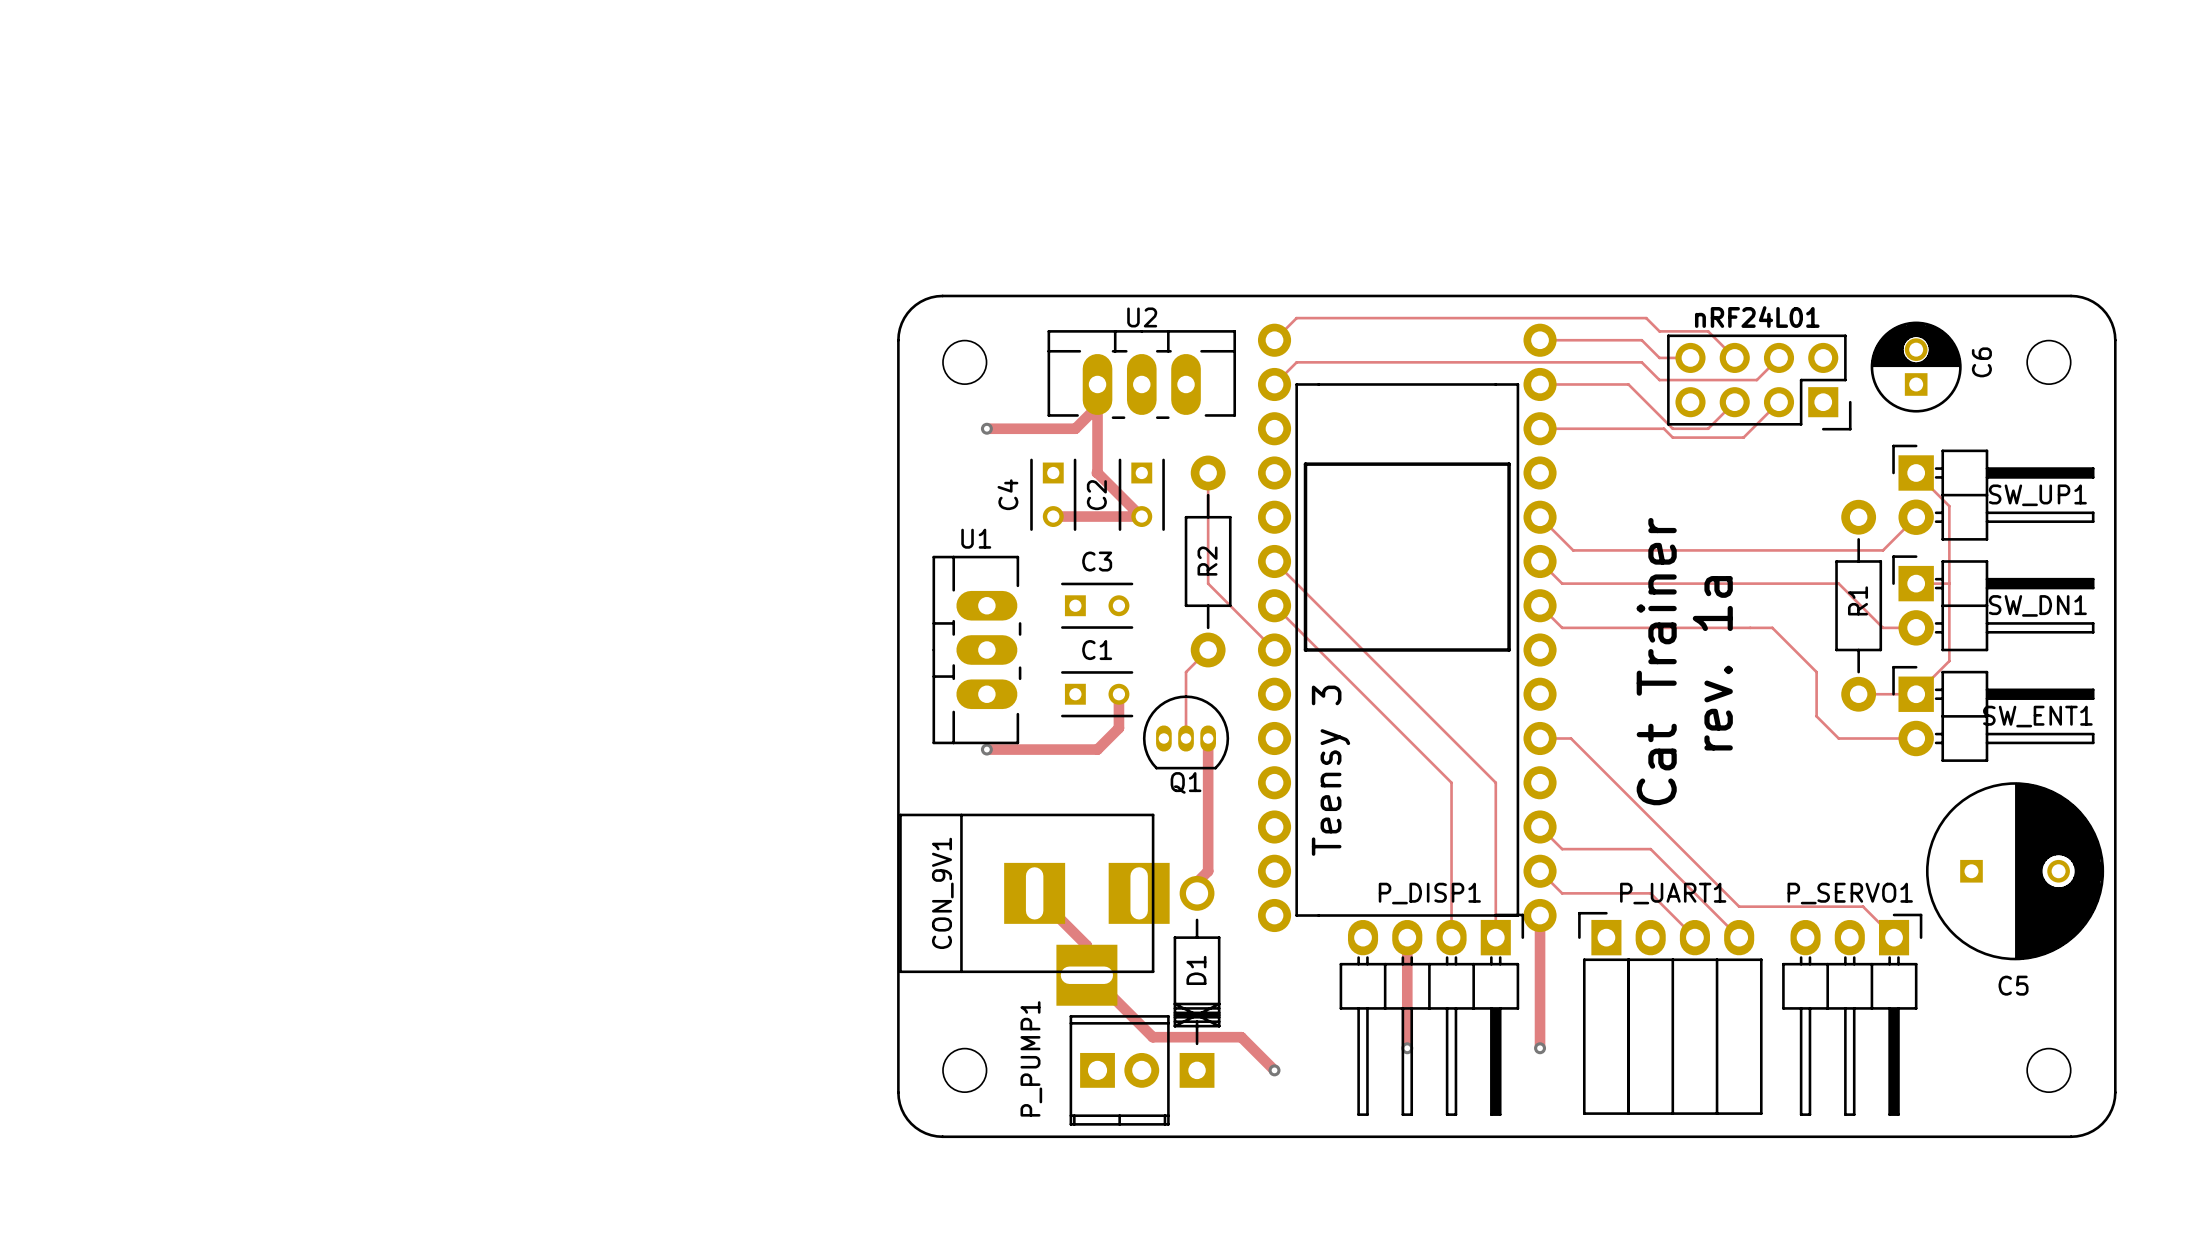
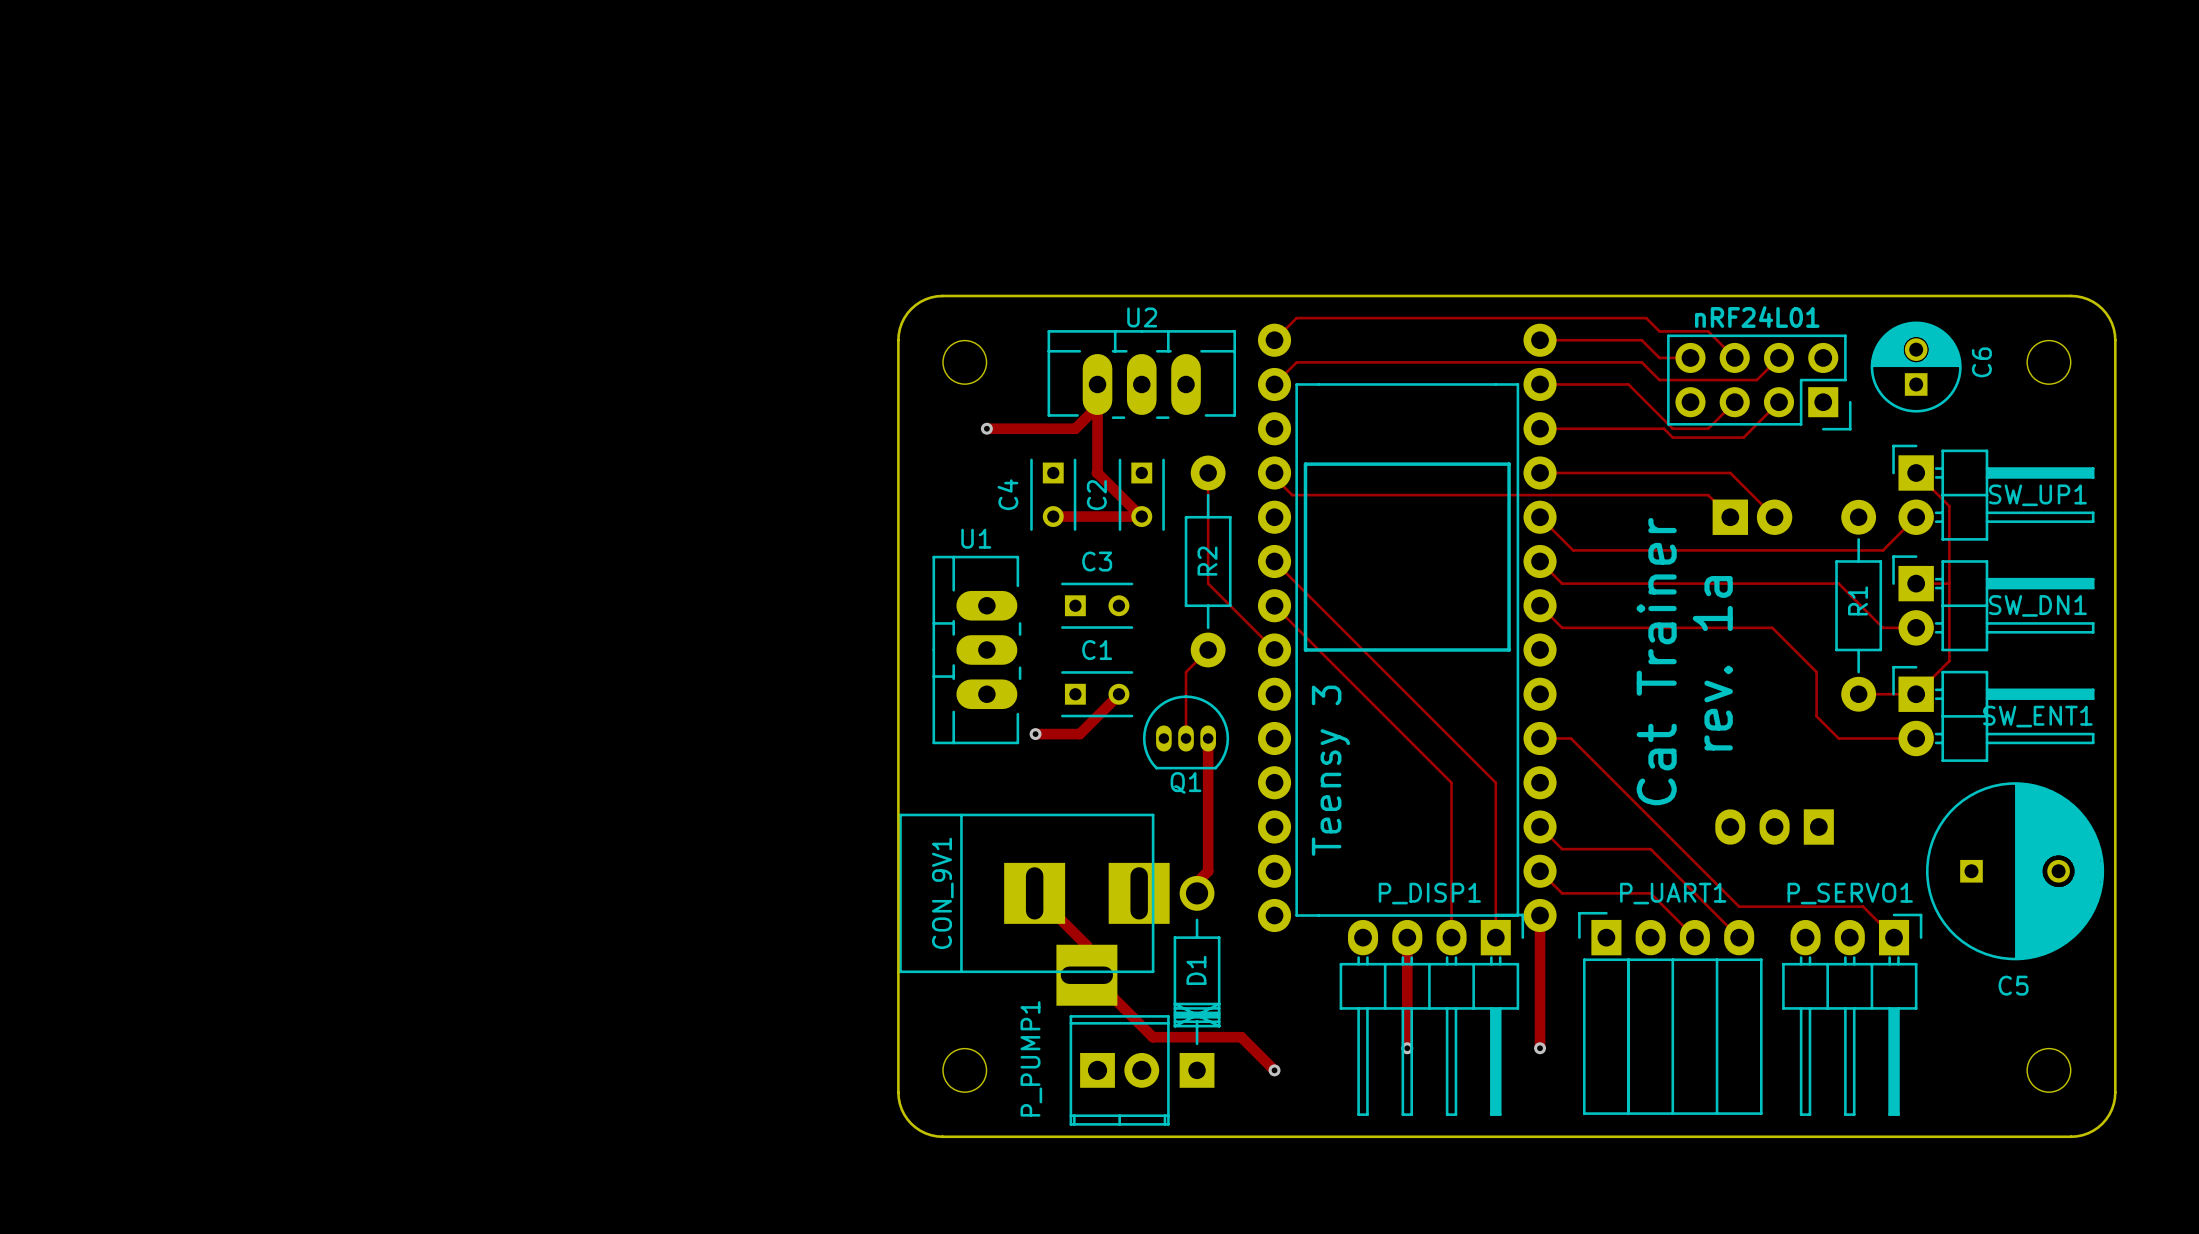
track: none -> (1274, 472) (1274, 477) (1292, 495) (1708, 495) (1730, 517)
track: none -> (1540, 472) (1730, 472) (1774, 517)
part: none -> (1752, 517)
track: (1118, 694) (1118, 728) (1097, 749) (986, 749) -> (1118, 694) (1079, 734) (1035, 734)
via position: (986, 749) -> (1035, 734)
part: none -> (1774, 827)

